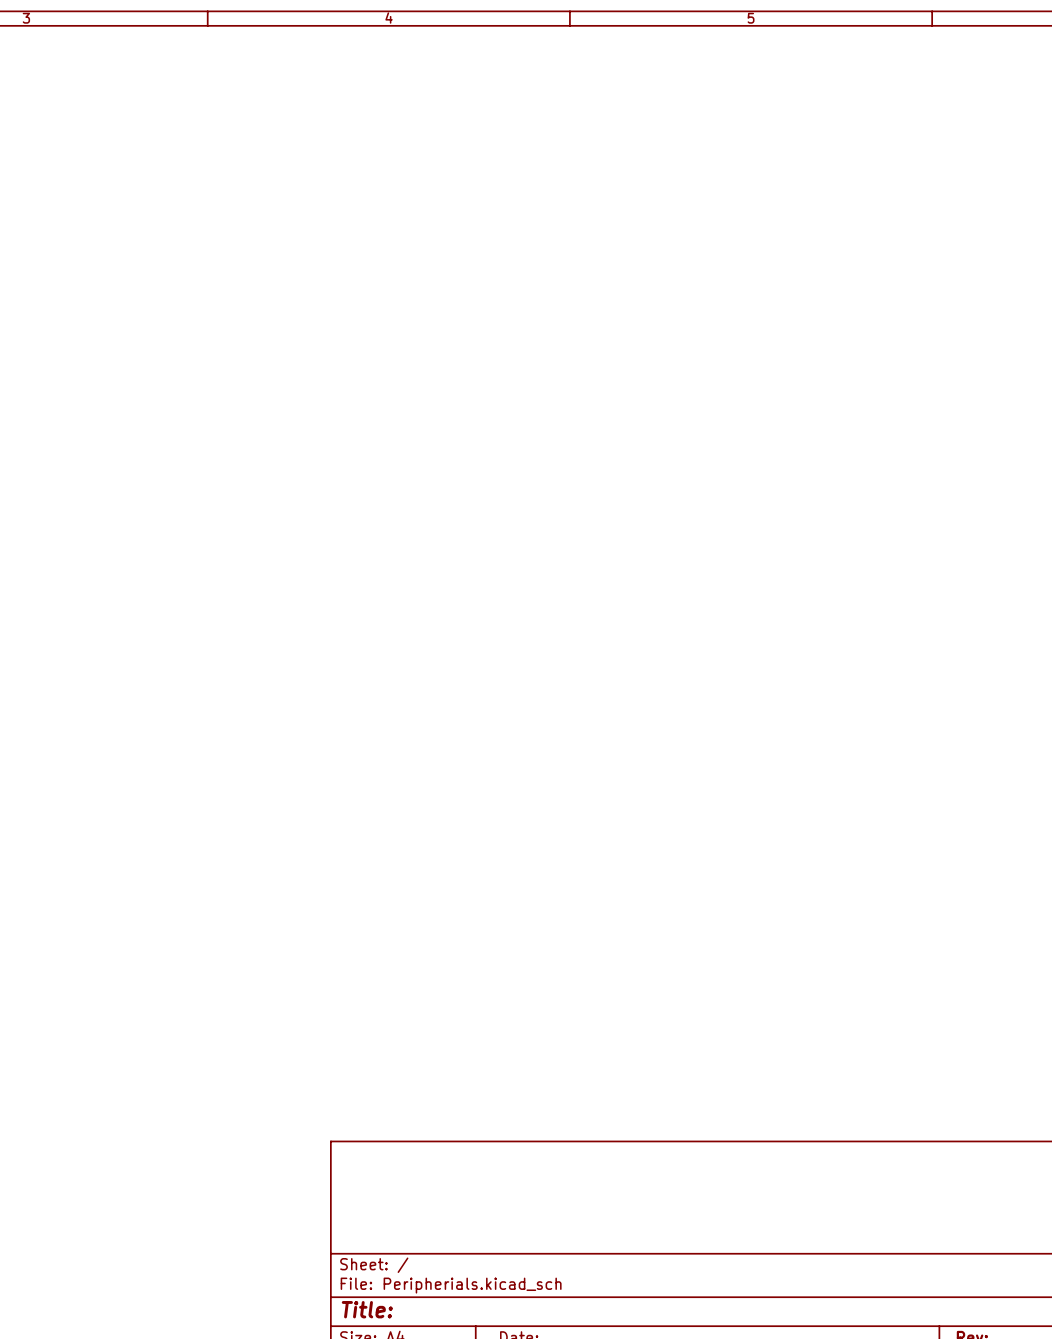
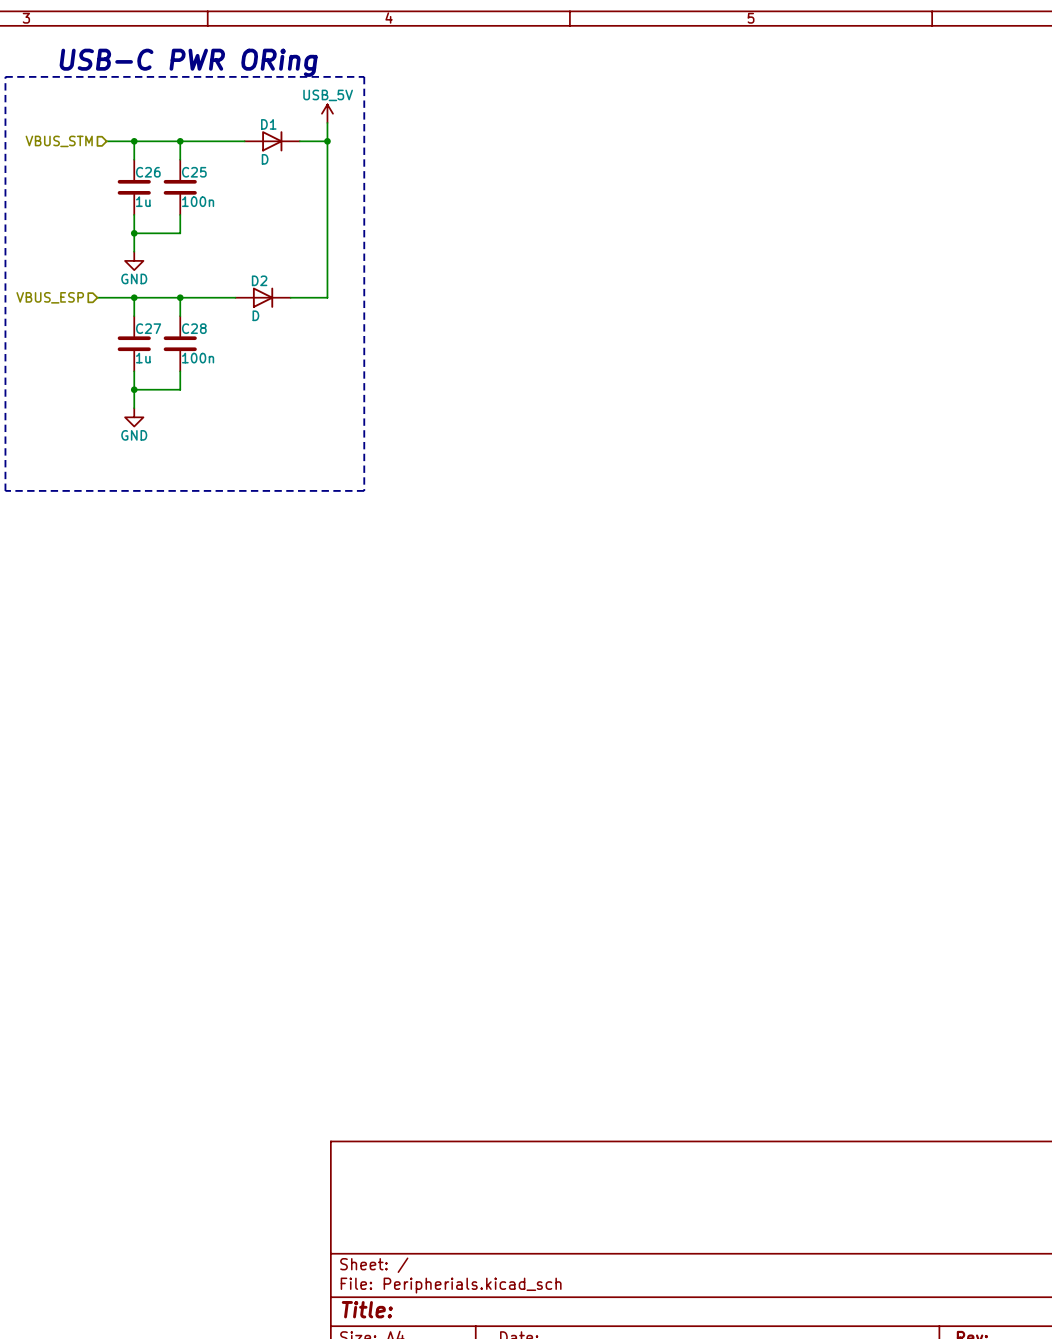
text: none -> USB-C PWR ORing (188, 62)
line: none -> (5, 76) (364, 76) (364, 490) (5, 490) (5, 76)
power symbol: none -> USB_5V (327, 113)
wire: none -> (327, 122) (327, 297) (290, 297)
hierarchical label: none -> VBUS_STM (59, 141)
wire: none -> (106, 141) (244, 141)
wire: none -> (134, 141) (134, 159)
junction: none -> (134, 141)
wire: none -> (180, 141) (180, 159)
junction: none -> (180, 141)
D1: none -> D (272, 141)
wire: none -> (299, 141) (327, 141)
junction: none -> (327, 141)
C26: none -> 1u (134, 187)
C25: none -> 100n (180, 187)
wire: none -> (134, 214) (134, 251)
wire: none -> (180, 214) (180, 233) (134, 233)
junction: none -> (134, 233)
power symbol: none -> GND (134, 260)
hierarchical label: none -> VBUS_ESP (50, 297)
wire: none -> (97, 297) (235, 297)
wire: none -> (134, 297) (134, 316)
junction: none -> (134, 297)
wire: none -> (180, 297) (180, 316)
junction: none -> (180, 297)
D2: none -> D (263, 297)
C27: none -> 1u (134, 343)
C28: none -> 100n (180, 343)
wire: none -> (134, 371) (134, 408)
wire: none -> (180, 371) (180, 389) (134, 389)
junction: none -> (134, 389)
power symbol: none -> GND (134, 417)

